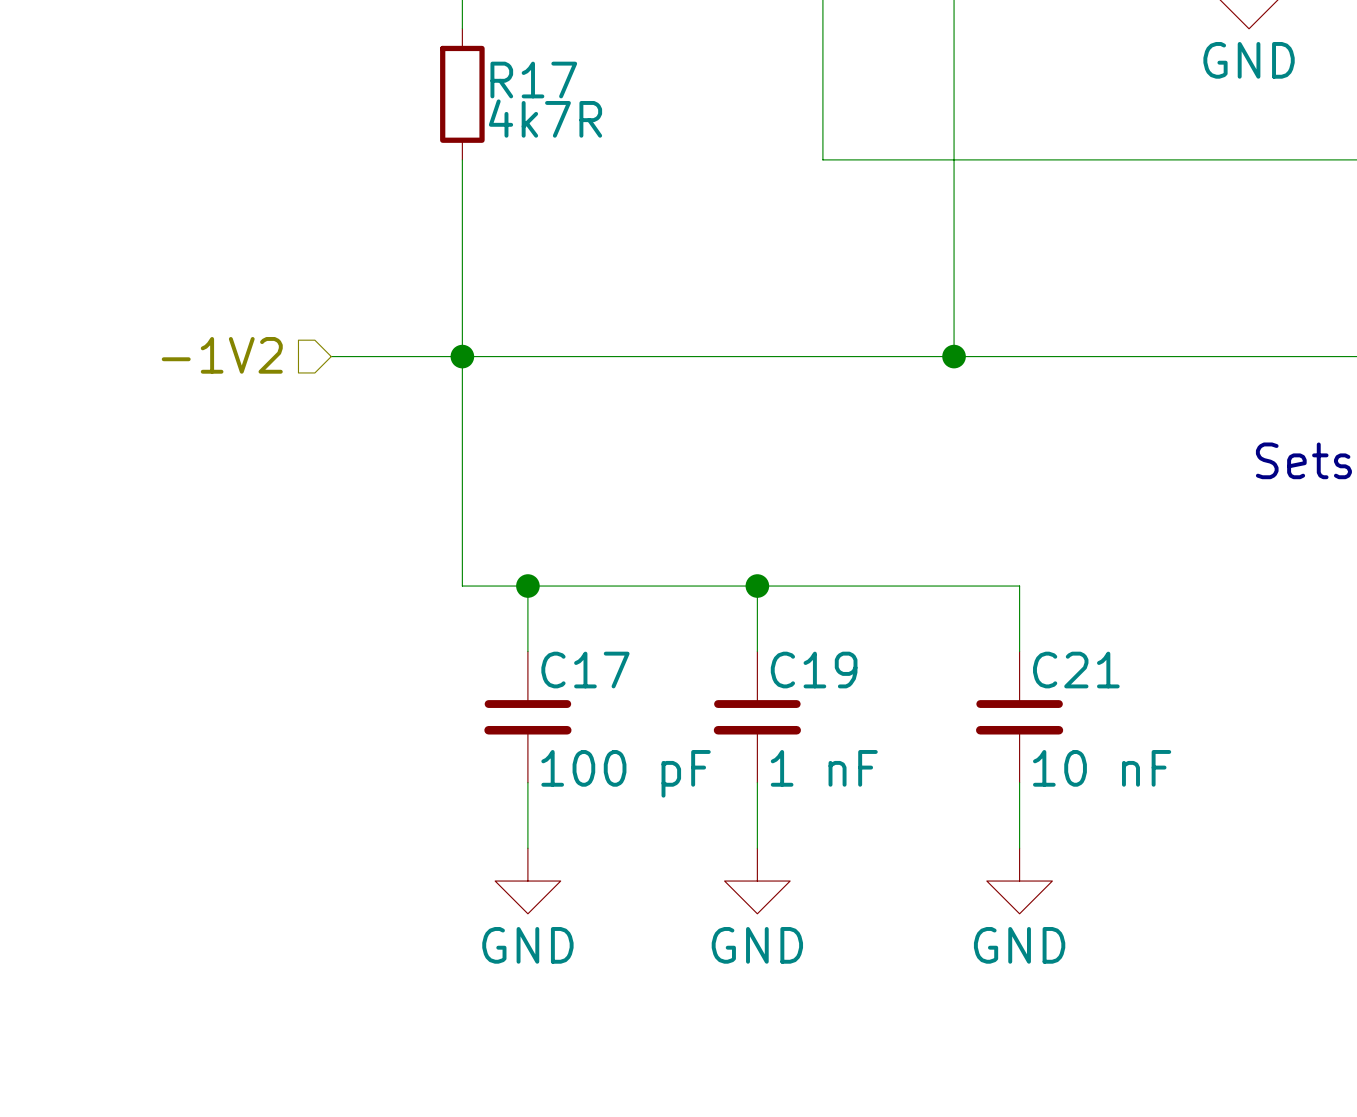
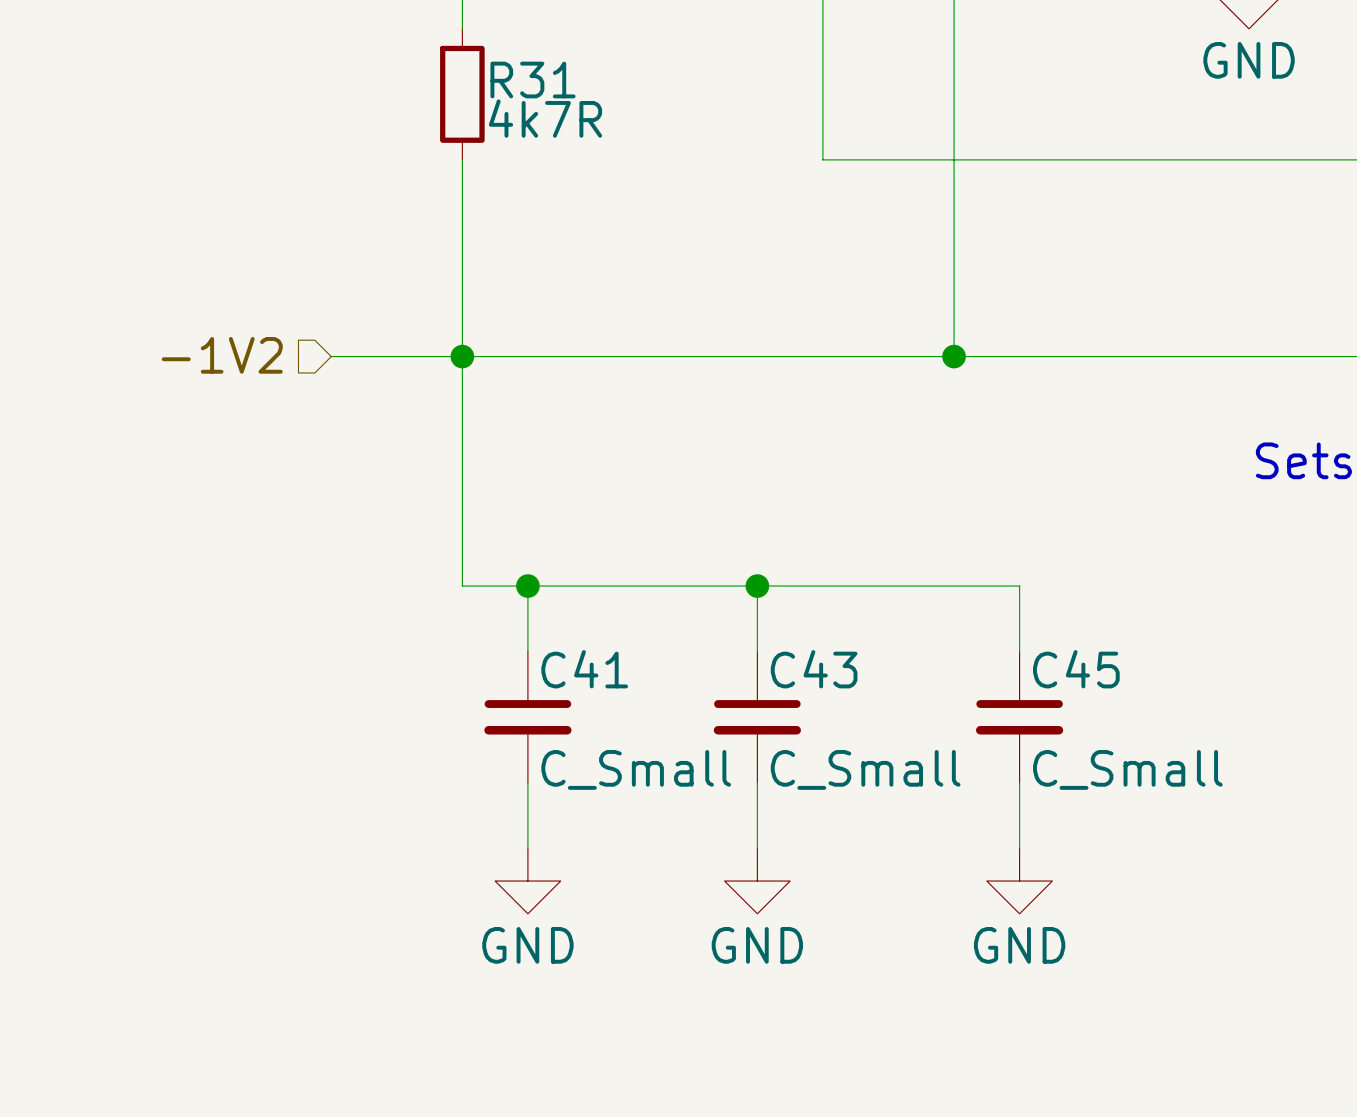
R17 name: R17 (533, 80) -> R31 (533, 80)
C17 name: C17 (585, 670) -> C41 (584, 669)
C19 name: C19 (814, 670) -> C43 (814, 669)
C21 name: C21 (1076, 670) -> C45 (1076, 669)
C19 value: 1 nF (824, 768) -> C_Small (865, 769)
C21 value: 10 nF (1102, 768) -> C_Small (1127, 769)
C17 value: 100 pF (626, 773) -> C_Small (636, 769)

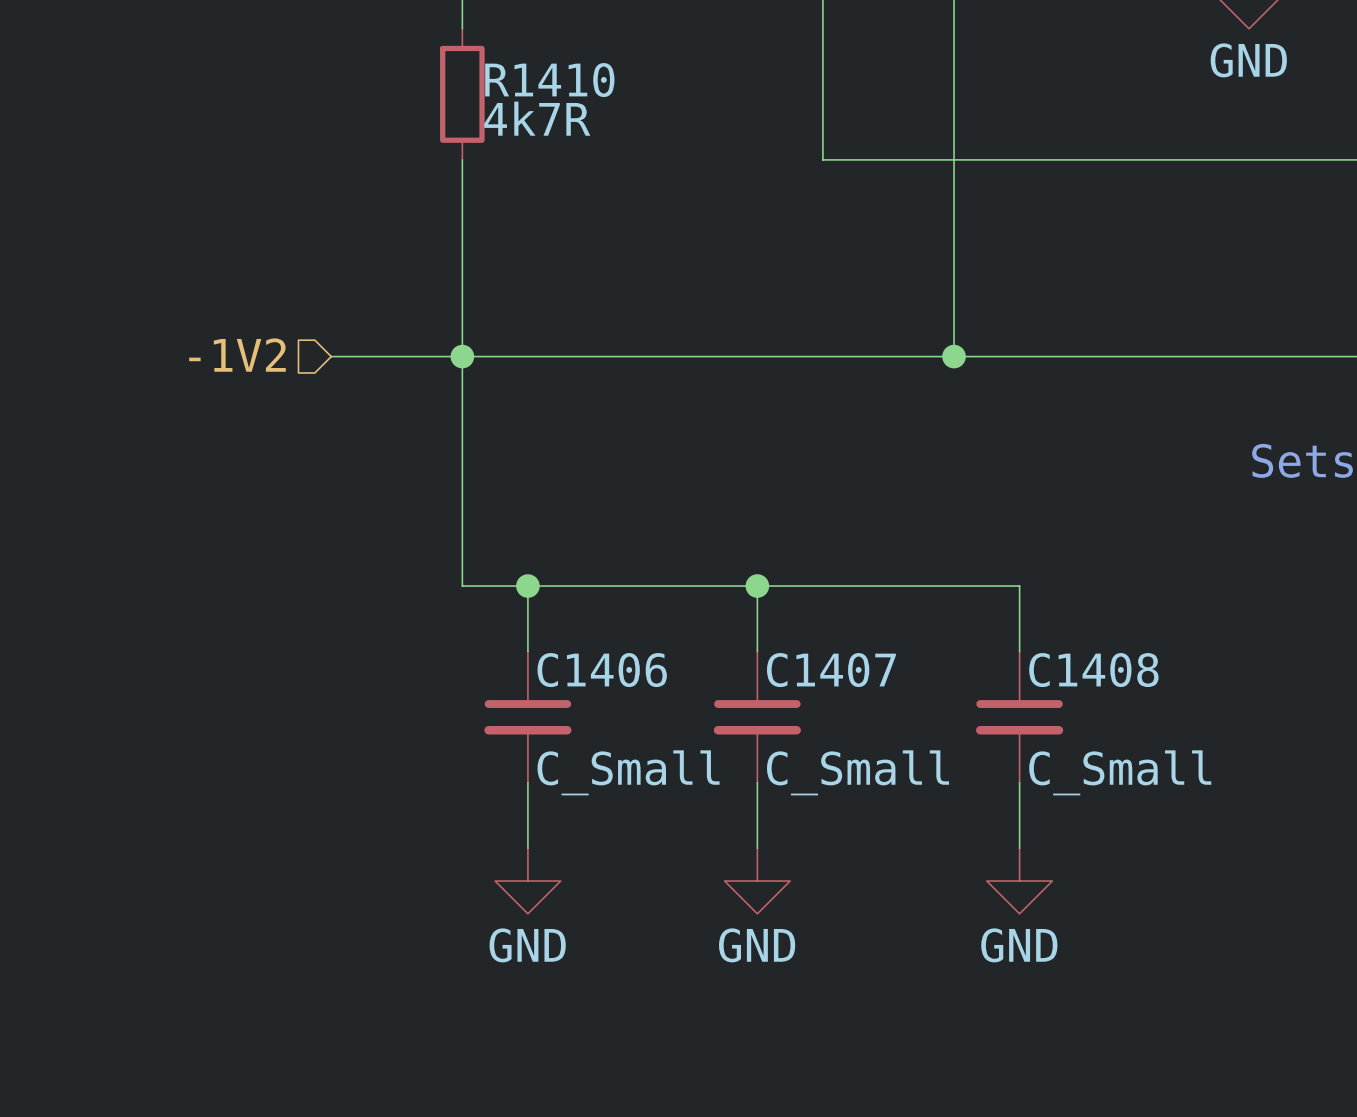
R31 name: R31 (533, 80) -> R1410 (549, 80)
C41 name: C41 (584, 669) -> C1406 (602, 670)
C43 name: C43 (814, 669) -> C1407 (831, 670)
C45 name: C45 (1076, 669) -> C1408 (1093, 670)

